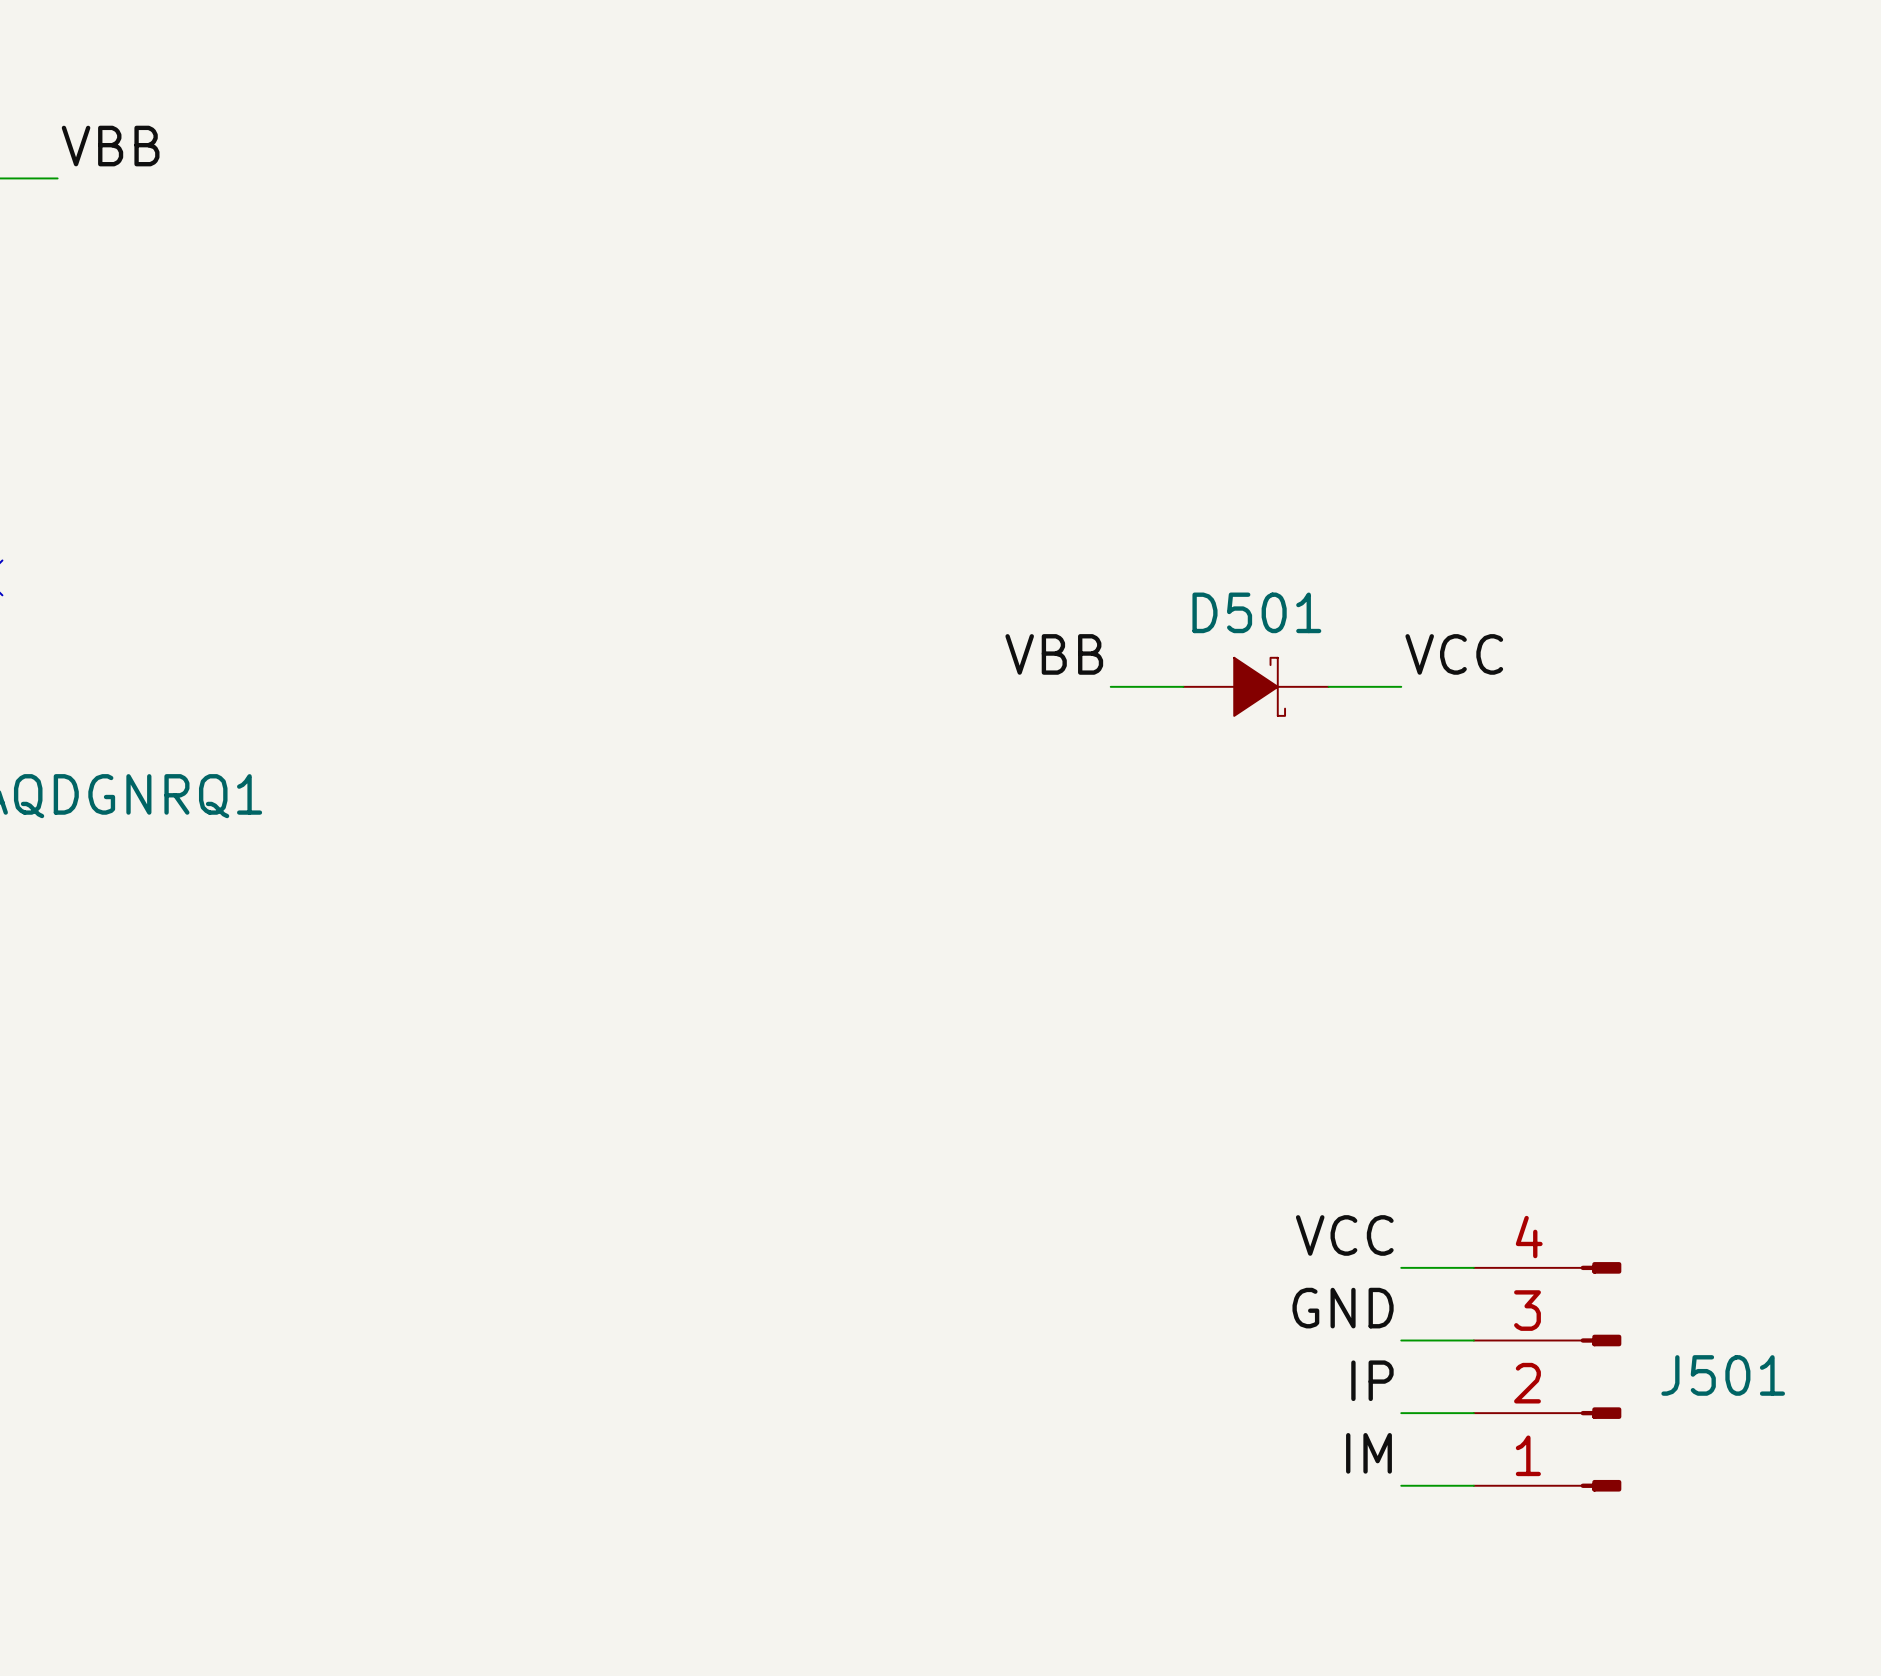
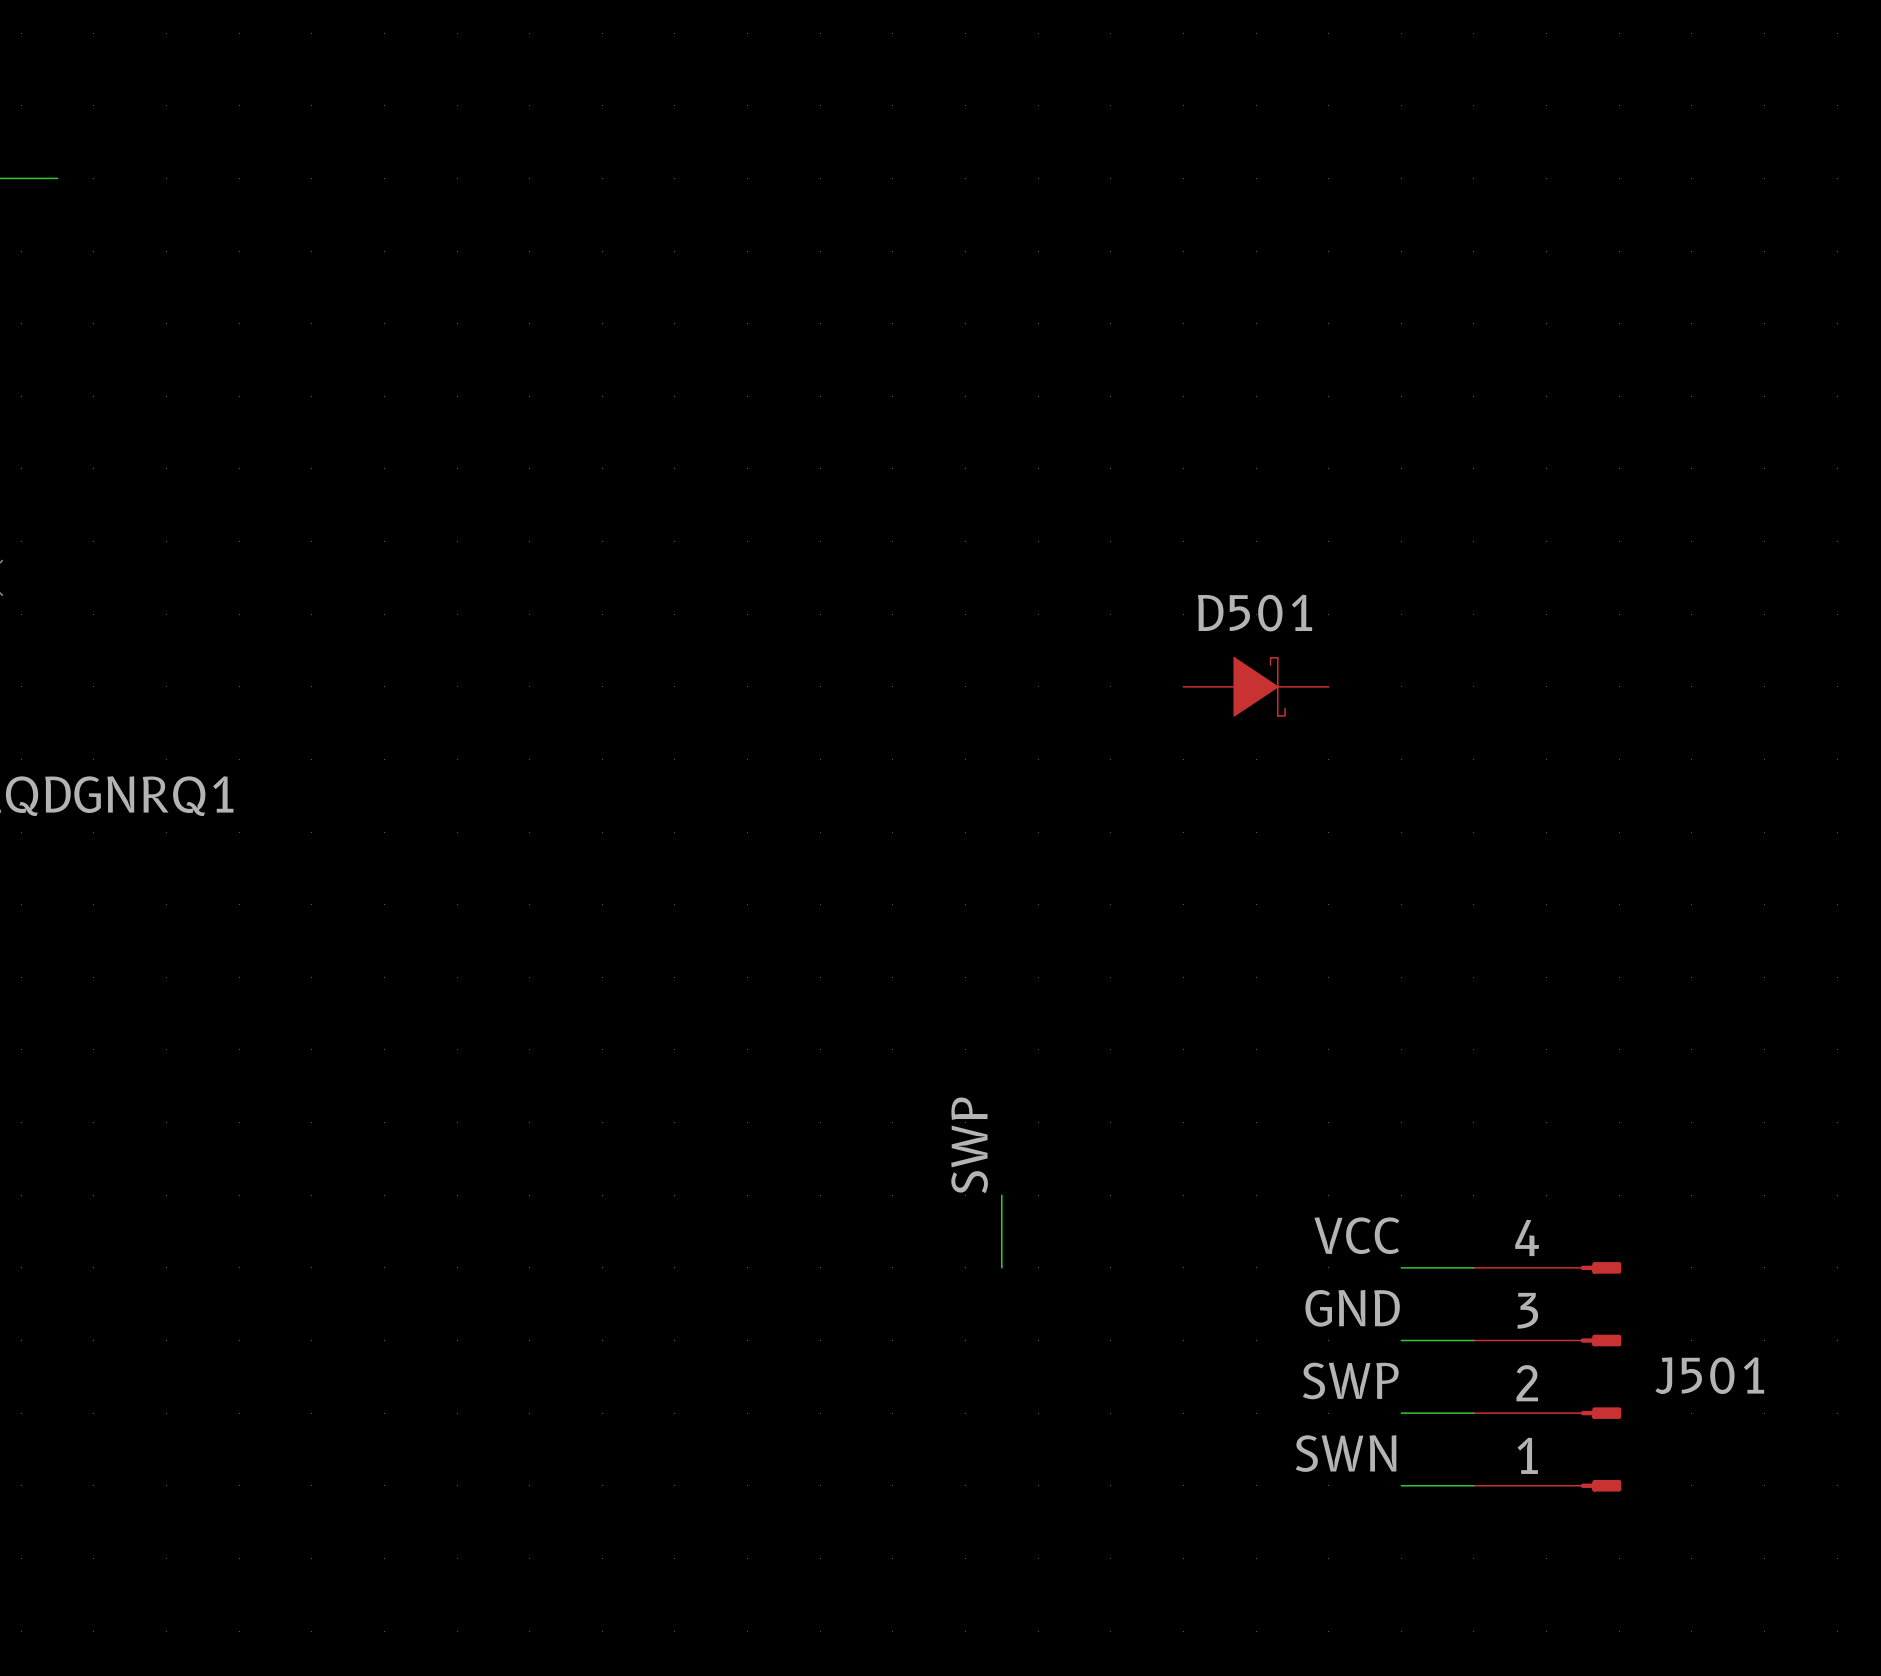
label: VBB (110, 146) -> none
label: VBB (1054, 654) -> none
label: VCC (1454, 654) -> none
wire: (1110, 686) (1183, 686) -> none
wire: (1328, 686) (1401, 686) -> none
label: none -> SWP (969, 1145)
wire: none -> (1001, 1195) (1001, 1267)
label: IP (1372, 1380) -> SWP (1350, 1380)
label: IM (1368, 1453) -> SWN (1346, 1453)

